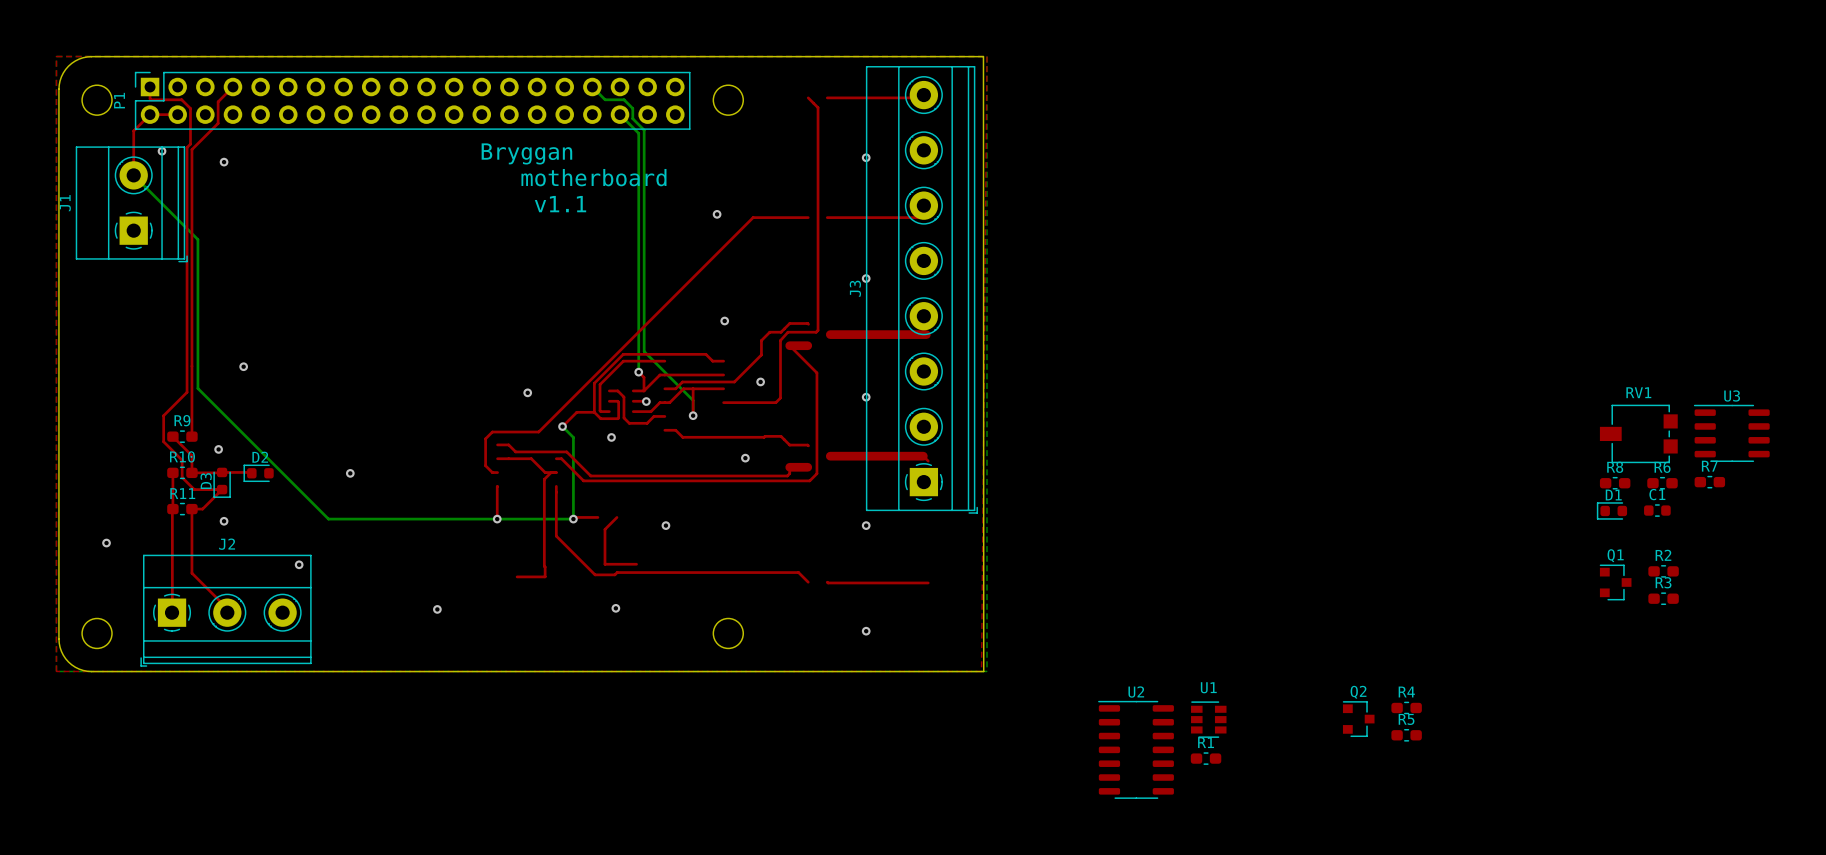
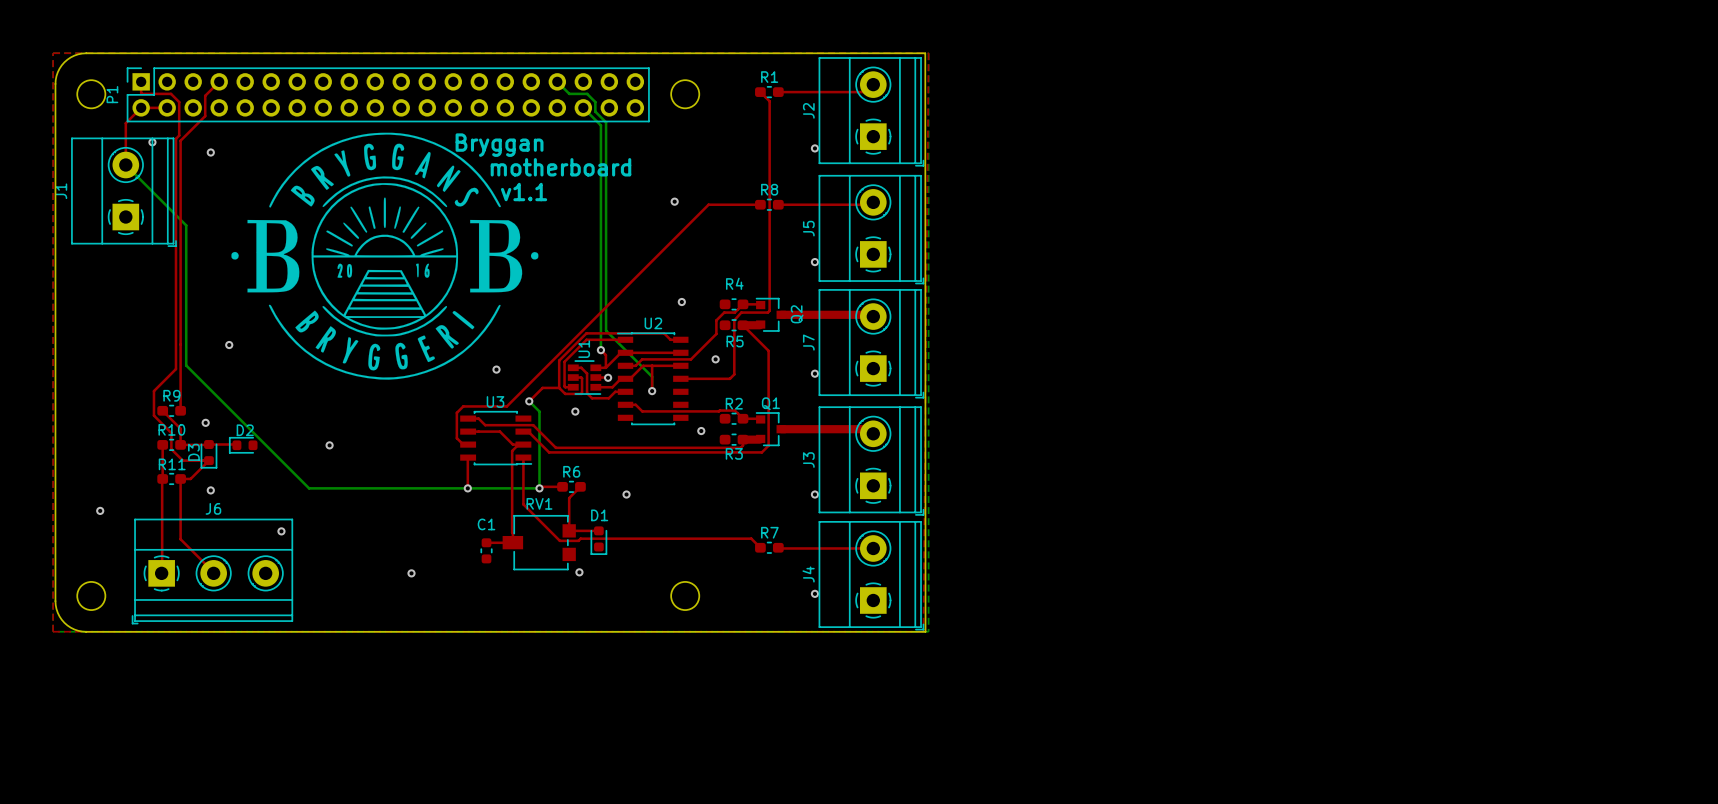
J3 footprint: [865, 66, 978, 514] -> [818, 406, 925, 516]
drawing: none -> [231, 132, 539, 380]
J5: none -> (871, 229)
J7: none -> (871, 343)
U3 footprint: [1693, 404, 1770, 462] -> [460, 410, 533, 466]
RV1 position: (1638, 433) -> (539, 542)
R7 position: (1709, 482) -> (769, 547)
R8 position: (1615, 483) -> (769, 204)
R6 position: (1662, 483) -> (571, 486)
D1 rotation: 0° (1612, 510) -> 90° counterclockwise (598, 540)
D1 position: (1612, 510) -> (598, 540)
C1 rotation: 0° (1657, 510) -> 90° clockwise (486, 550)
C1 position: (1657, 510) -> (486, 550)
J2 name position: J2 (227, 544) -> J2 (808, 110)
J2 footprint: [140, 554, 312, 667] -> [818, 57, 925, 167]
R2 position: (1663, 571) -> (734, 418)
Q1 position: (1615, 582) -> (770, 429)
R3 name position: R3 (1663, 582) -> R3 (734, 453)
R3 position: (1663, 598) -> (734, 439)
J6: none -> (212, 571)
J4: none -> (871, 575)
Q2 name rotation: 0° (1358, 692) -> 90° counterclockwise (797, 314)
Q2 name position: Q2 (1358, 692) -> Q2 (797, 314)
R4 name position: R4 (1406, 692) -> R4 (734, 283)
U2 footprint: [1098, 700, 1174, 799] -> [617, 332, 689, 426]
R4 position: (1406, 707) -> (734, 304)
U1 rotation: 0° (1208, 719) -> 180° (584, 377)
U1 position: (1208, 719) -> (584, 377)
Q2 position: (1358, 719) -> (770, 314)
R5 name position: R5 (1406, 719) -> R5 (735, 341)
R5 position: (1406, 735) -> (734, 325)
R1 position: (1206, 758) -> (769, 92)

